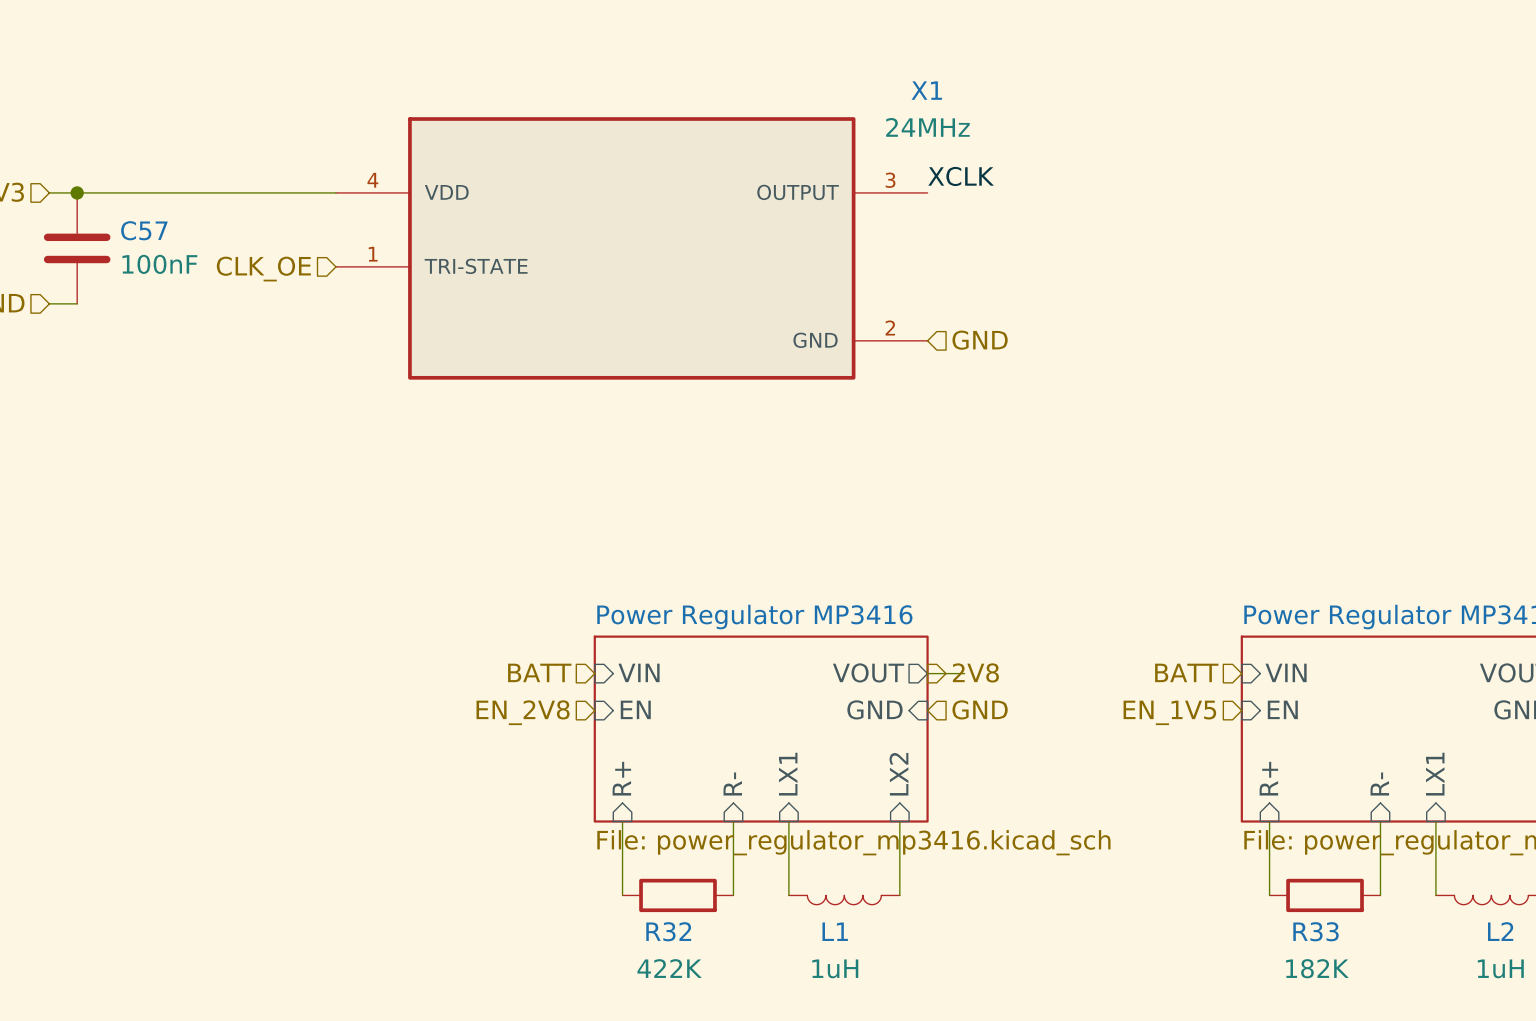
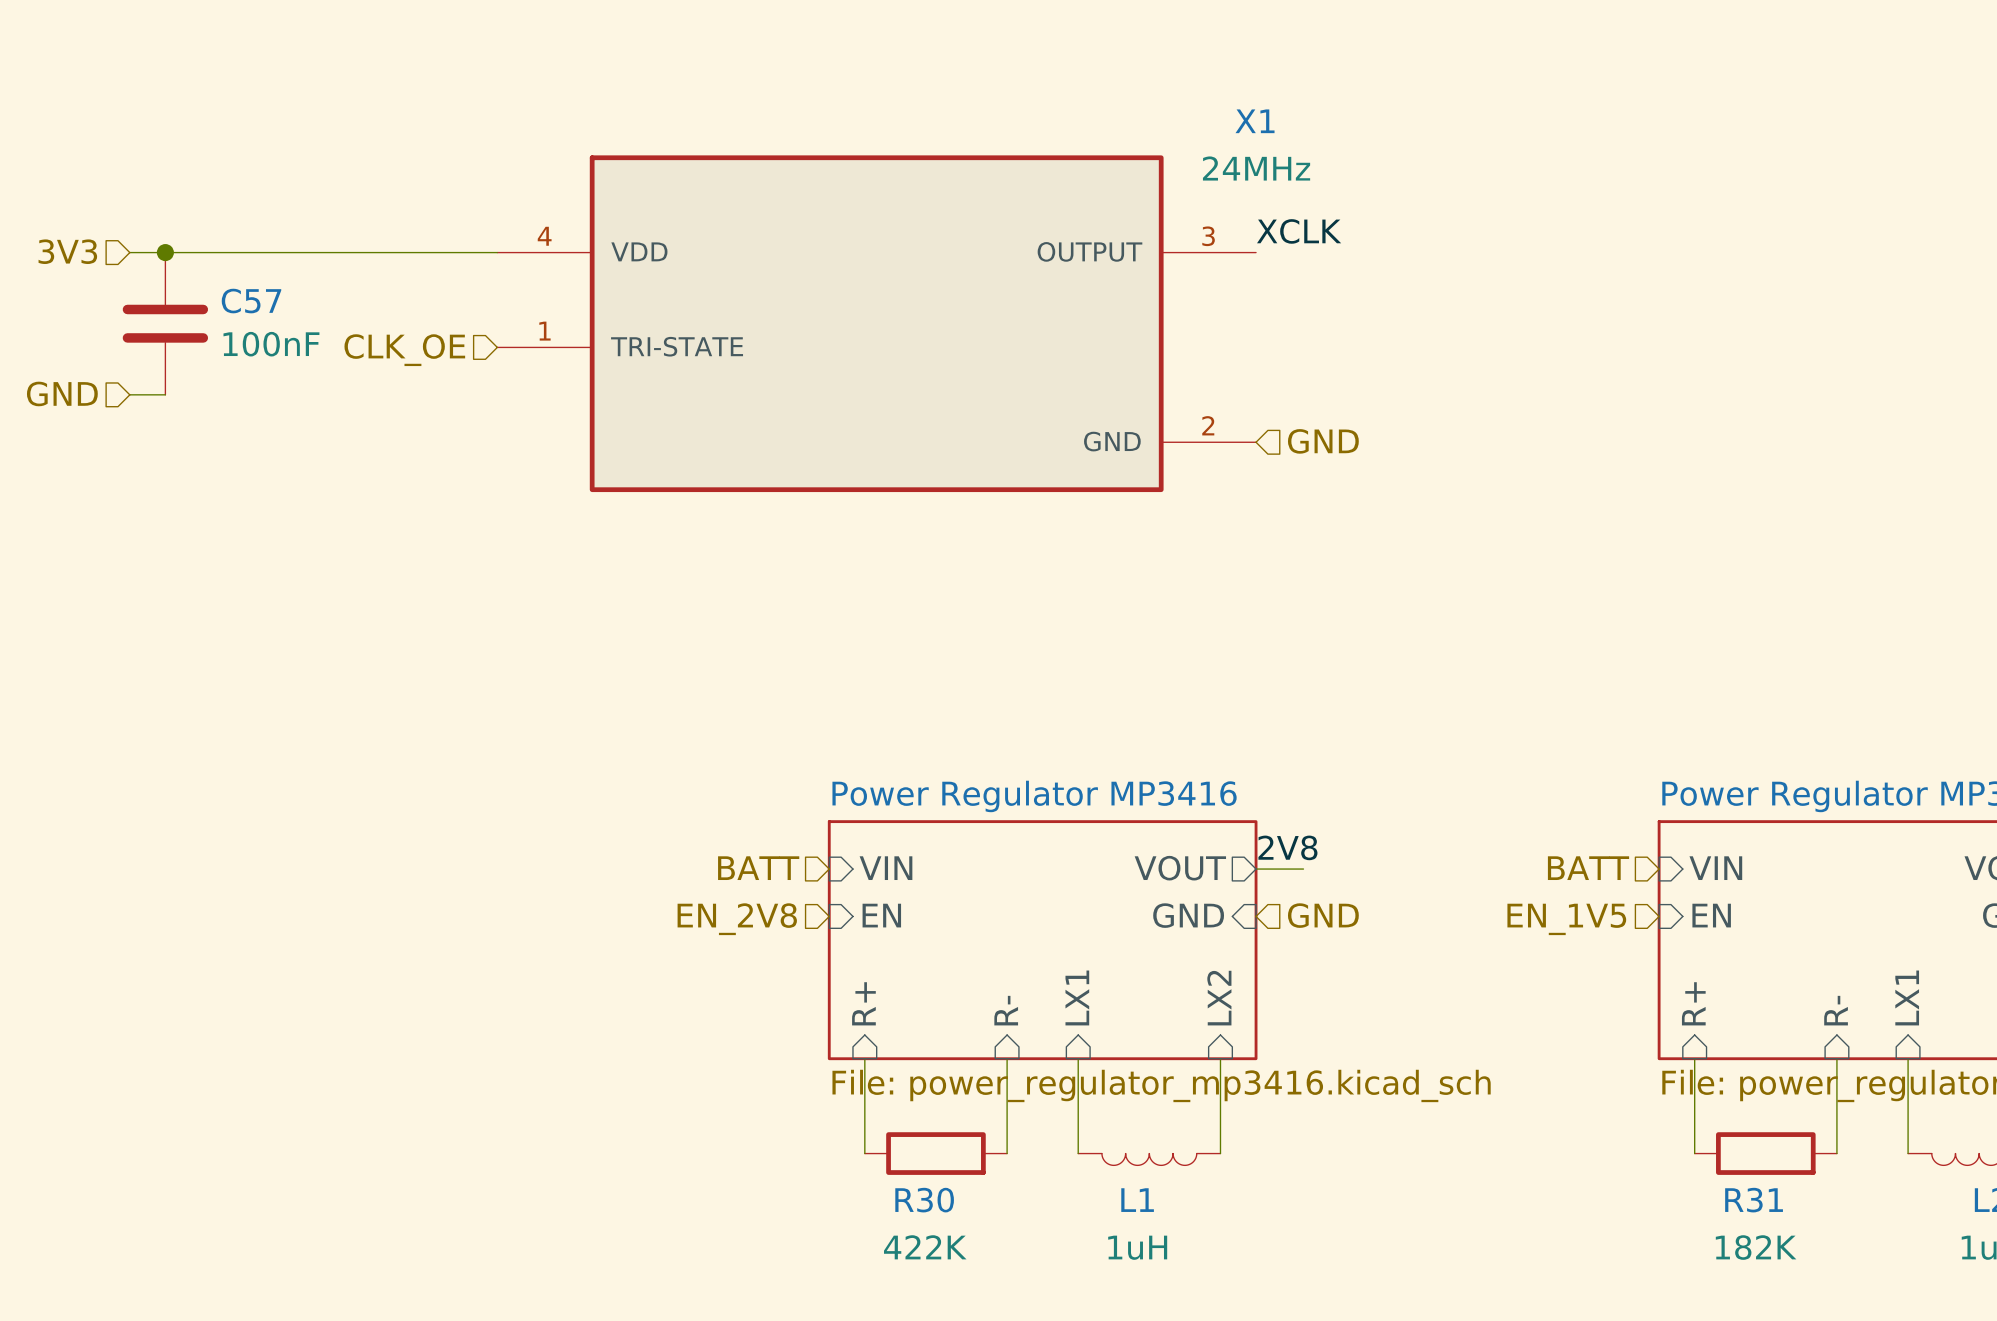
label: none -> 2V8 (1287, 847)
hierarchical label: 2V8 (975, 672) -> none
R32 name: R32 (668, 931) -> R30 (924, 1200)
R33 name: R33 (1316, 931) -> R31 (1754, 1200)

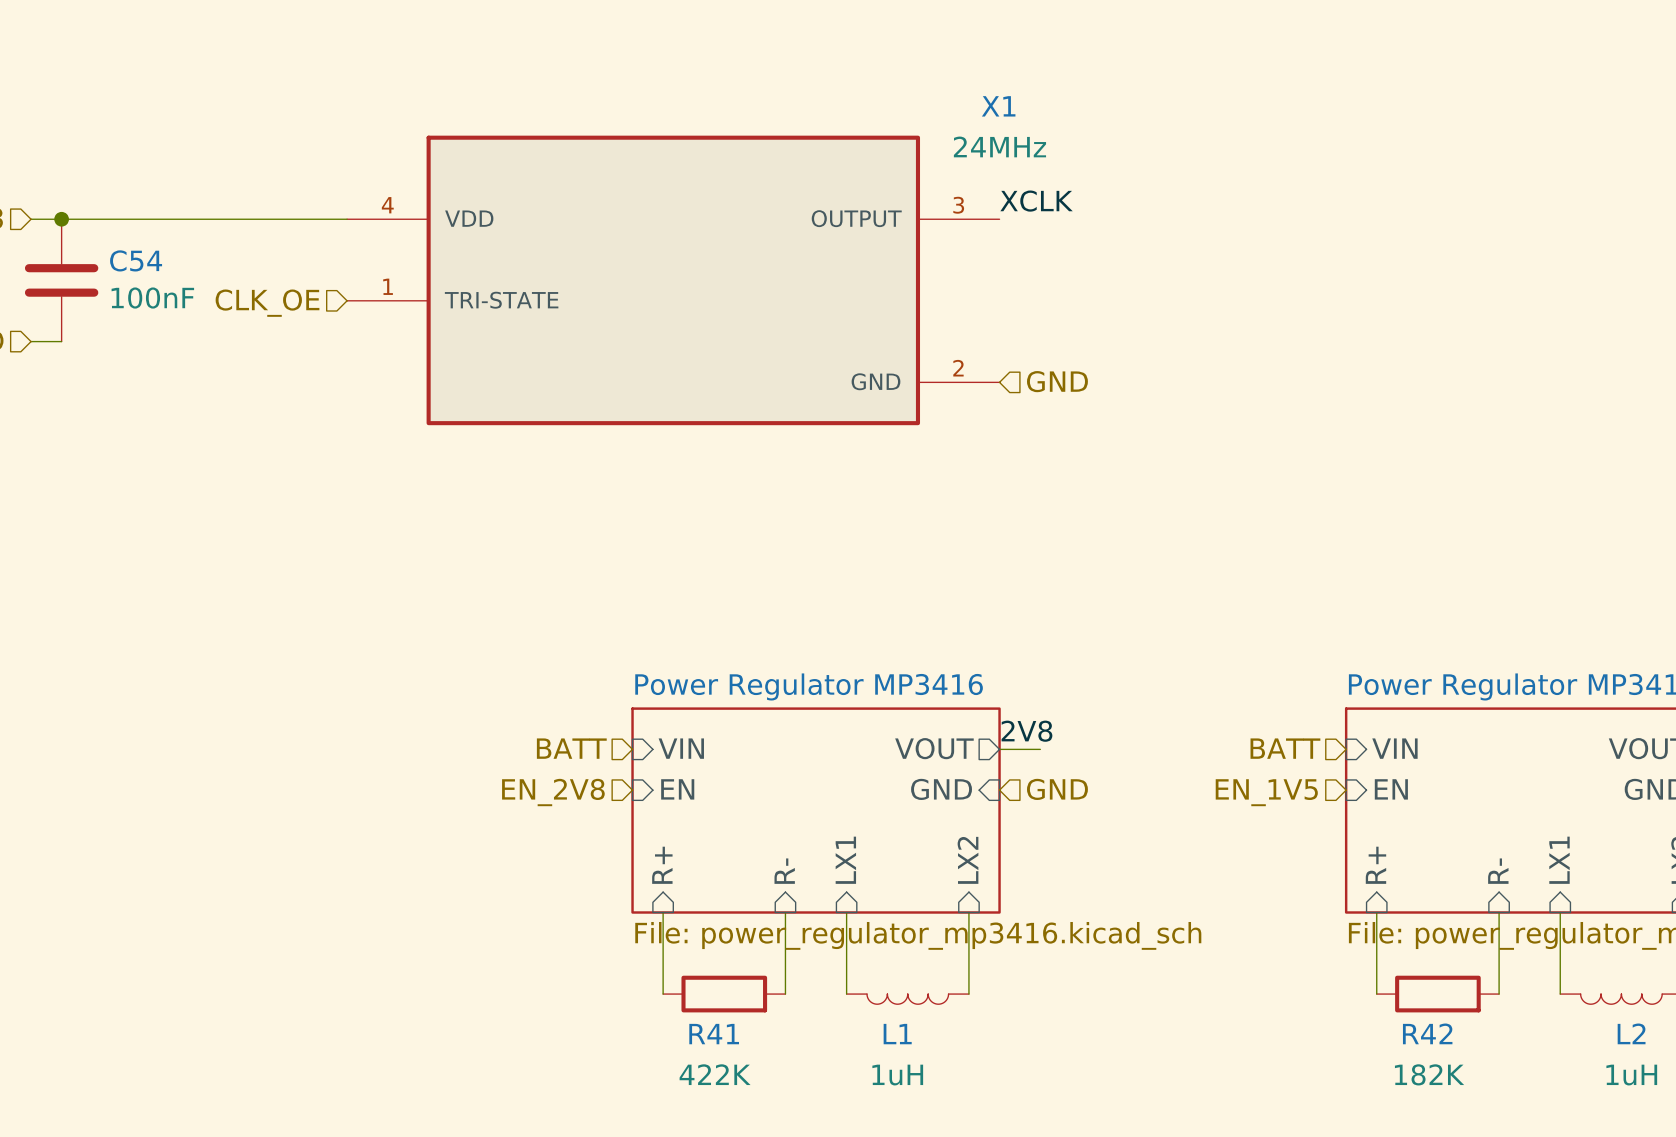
C57 name: C57 (251, 301) -> C54 (136, 260)
R30 name: R30 (924, 1200) -> R41 (714, 1034)
R31 name: R31 (1754, 1200) -> R42 (1427, 1033)

